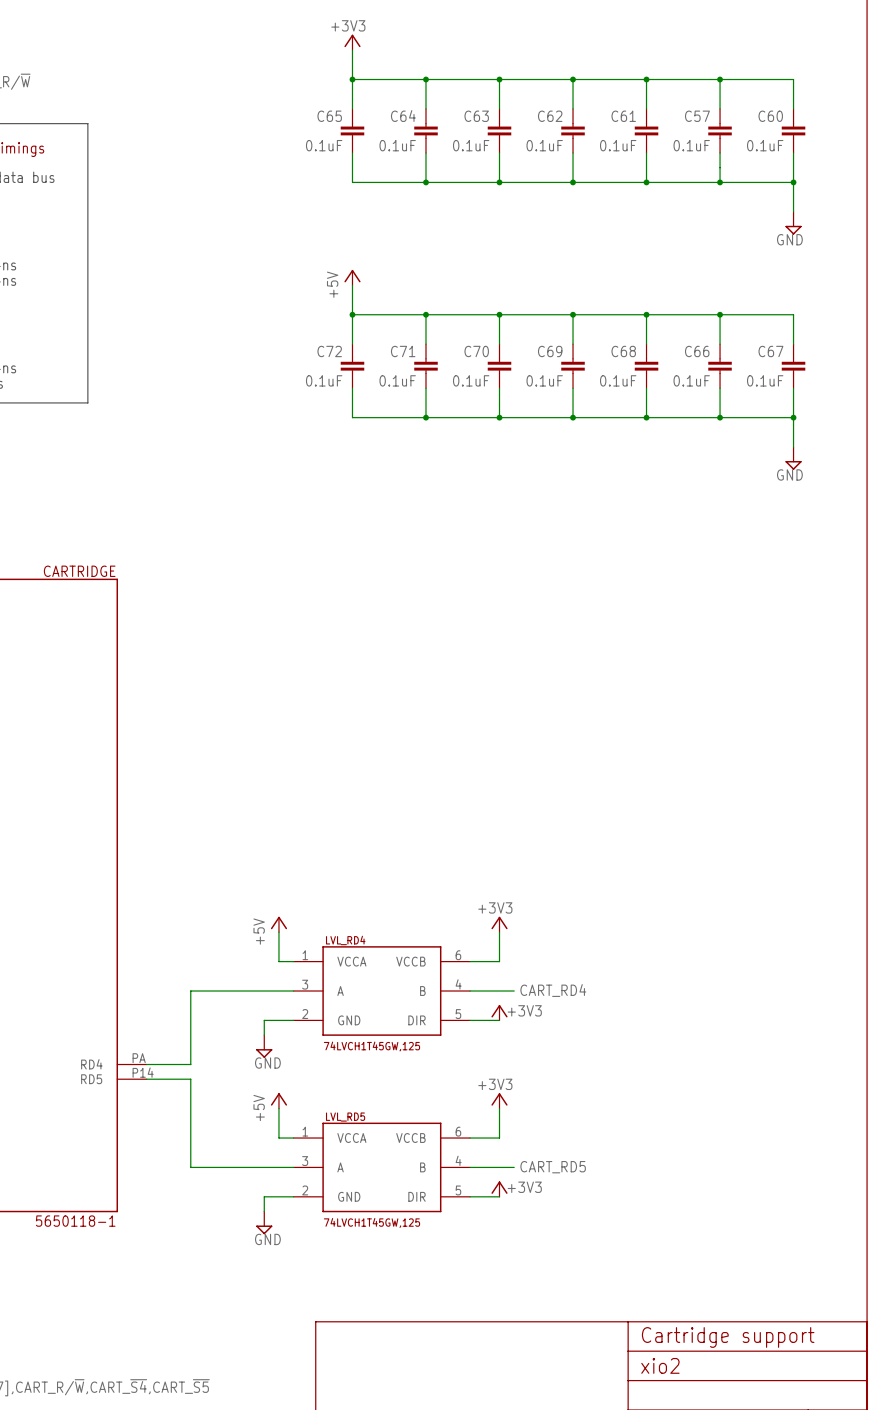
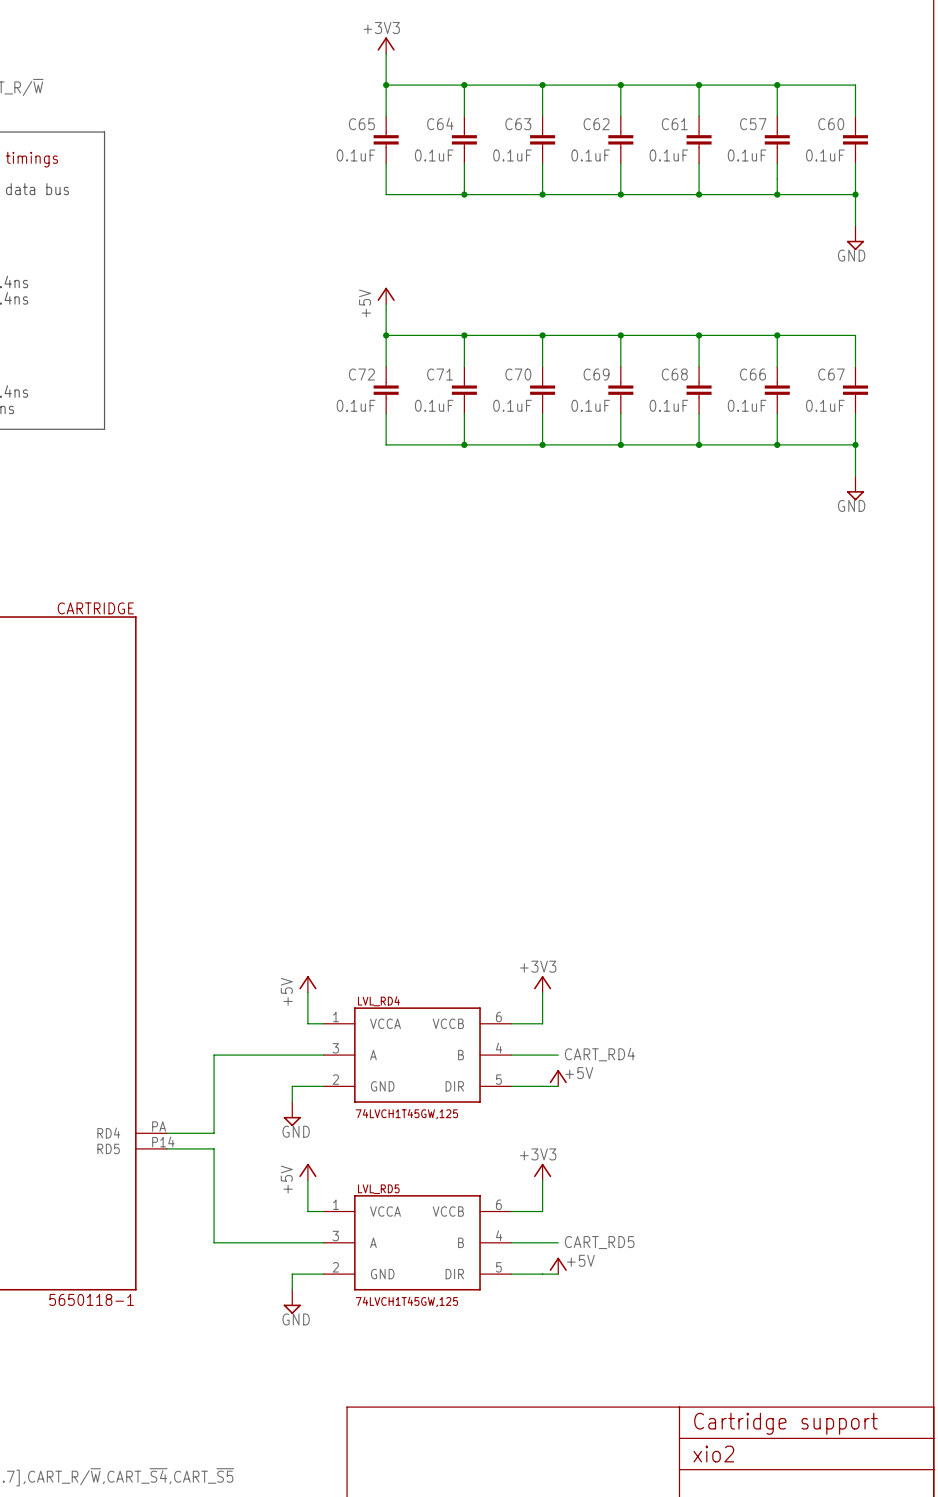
power symbol: +3V3 (499, 1012) -> none
power symbol: none -> +5V (558, 1078)
wire: none -> (542, 1086) (558, 1086)
power symbol: +3V3 (499, 1189) -> none
power symbol: none -> +5V (558, 1265)
wire: none -> (542, 1274) (558, 1274)

